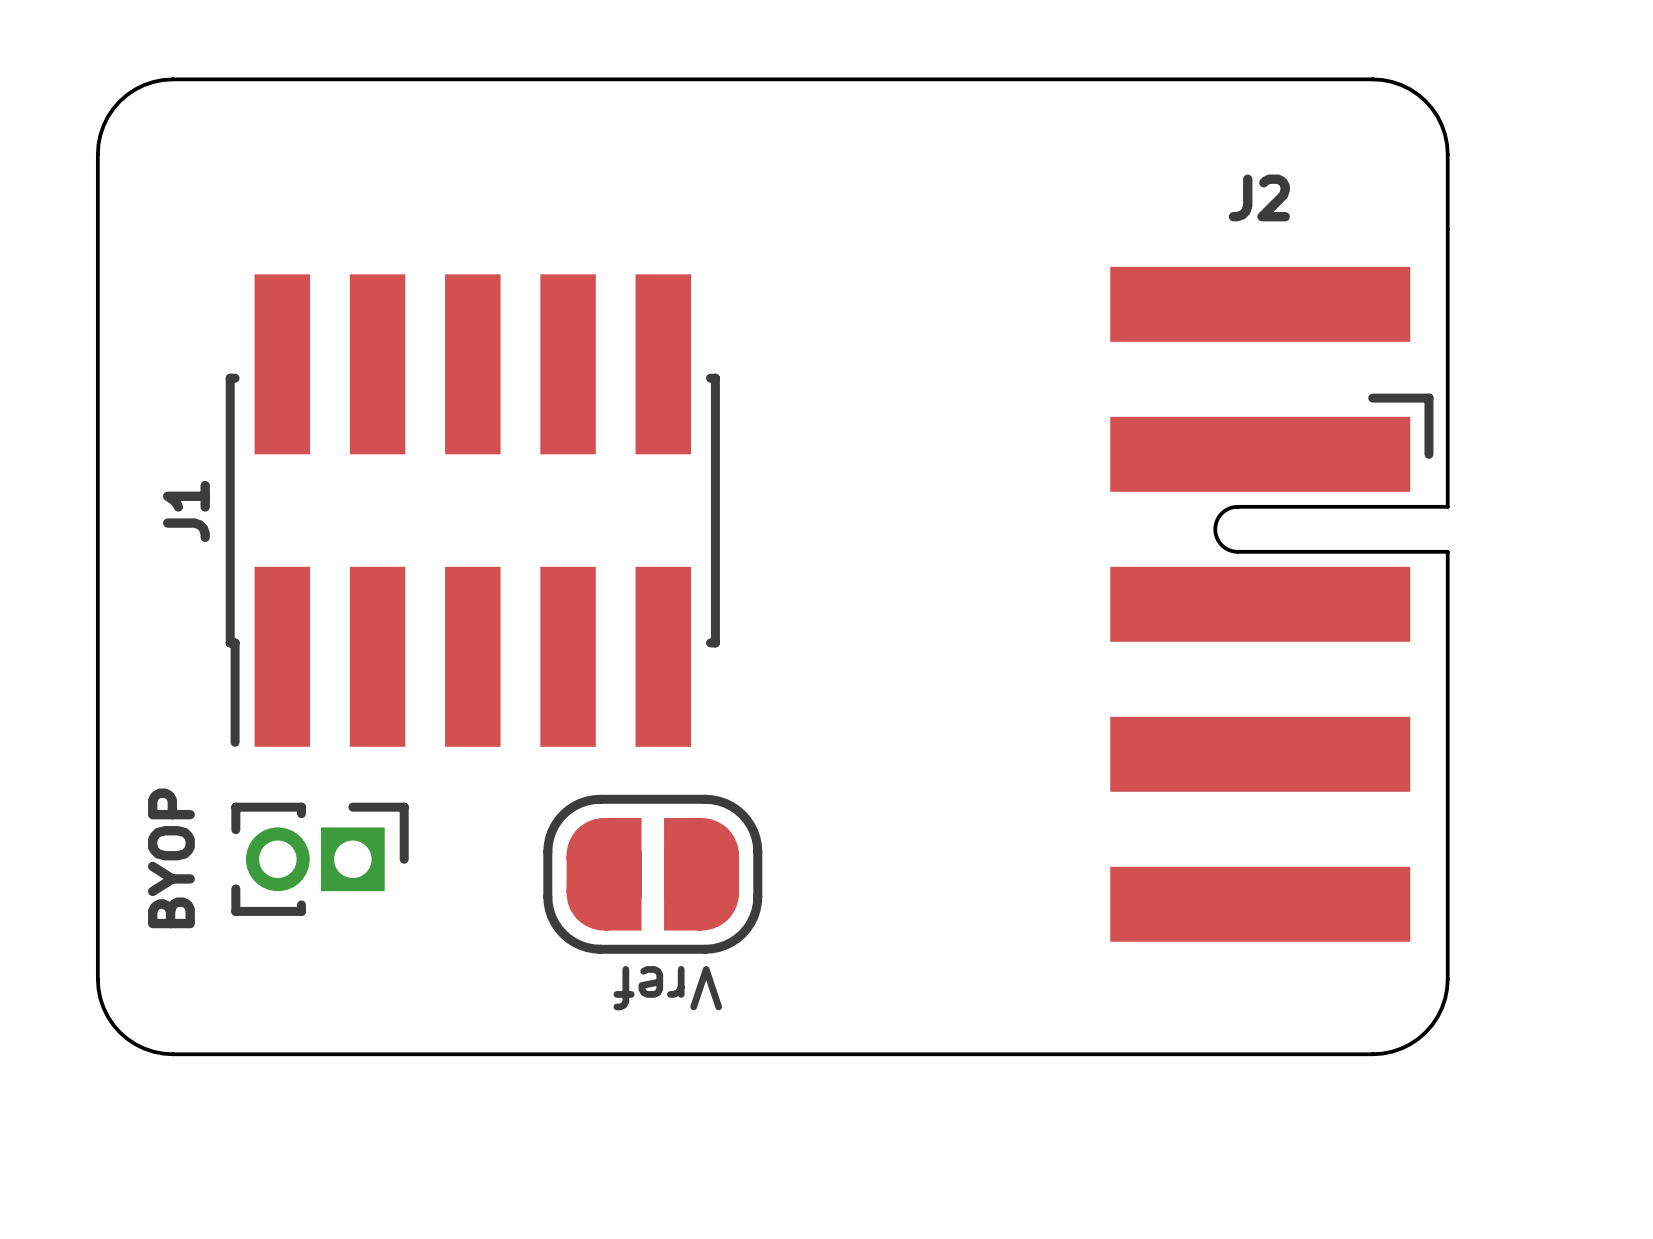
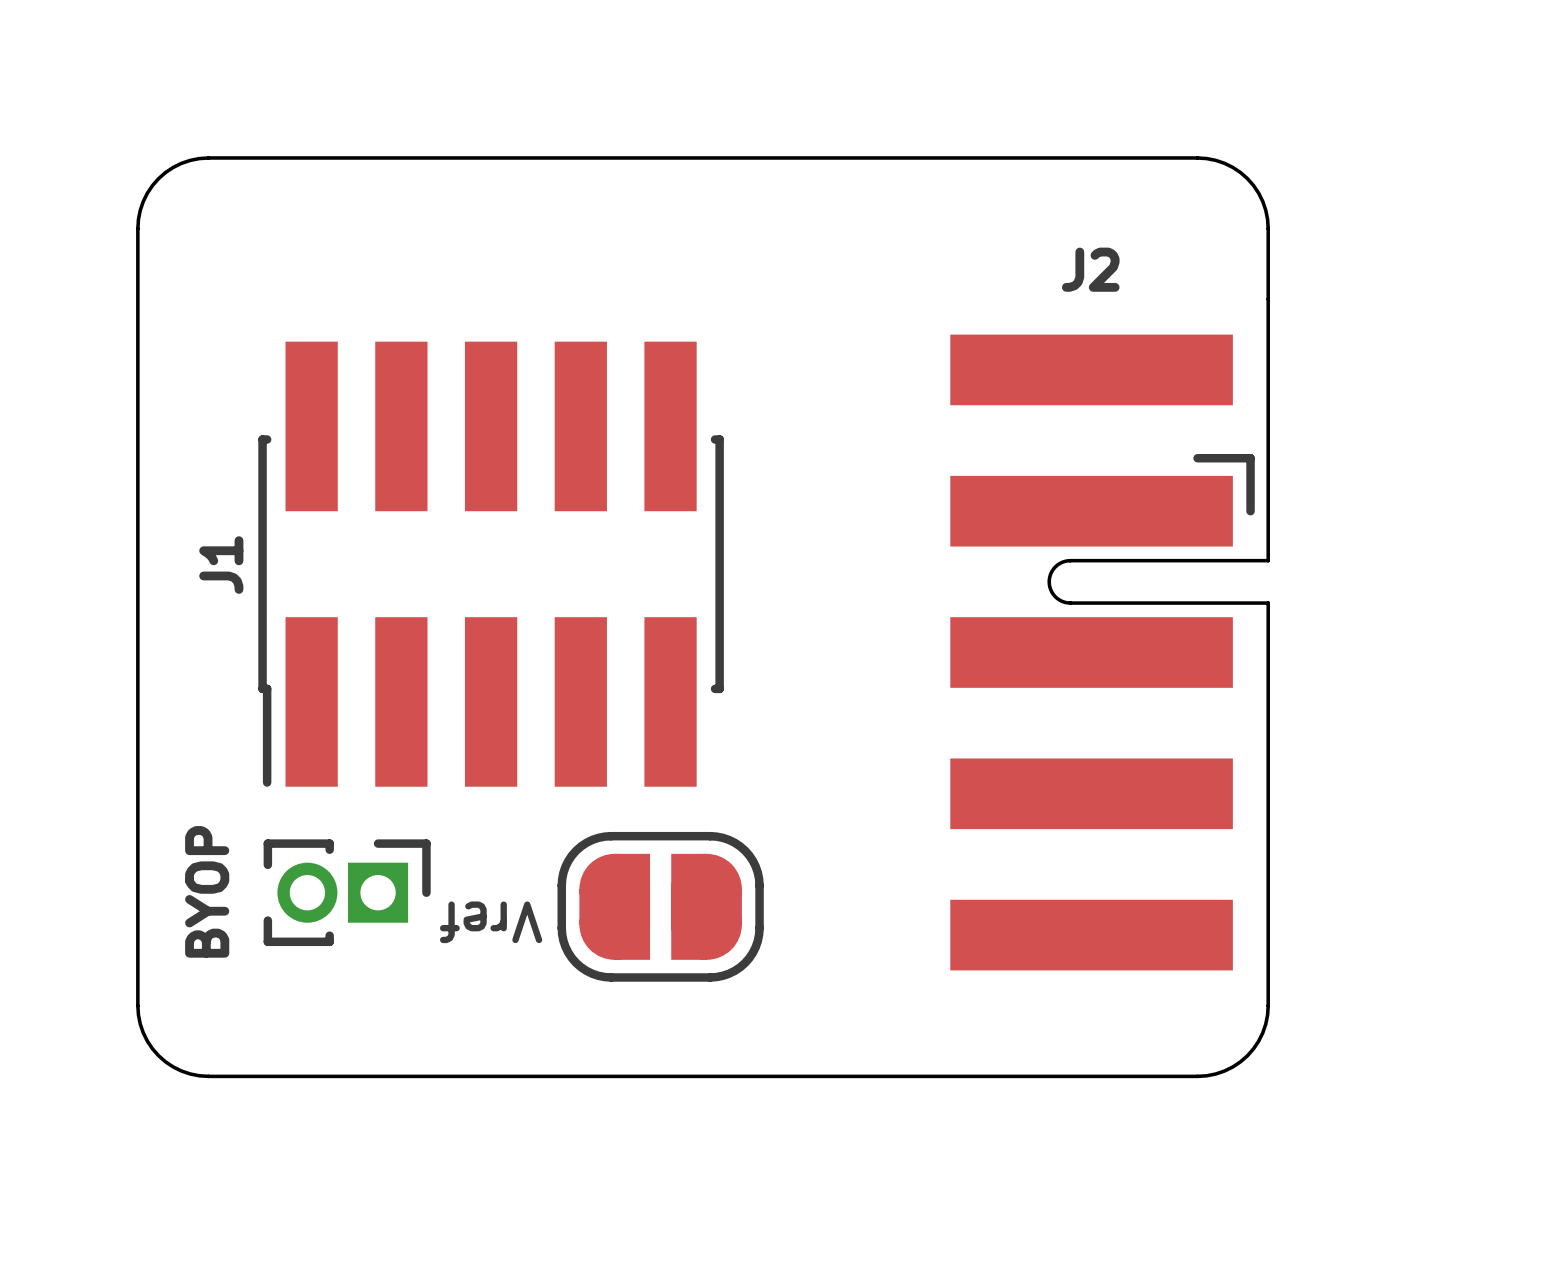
board edge: (1222, 79) (1372, 79) (1392, 81) (1410, 89) (1432, 108) (1445, 134) (1447, 154) (1447, 229) -> (1197, 157) (1215, 160) (1232, 167) (1247, 178) (1258, 193) (1267, 219) (1268, 299)
J2 position: (1279, 604) -> (1110, 652)
board edge: (1447, 979) (1442, 1007) (1432, 1024) (1418, 1038) (1392, 1051) (1372, 1054) (1222, 1054) -> (1268, 1005) (1262, 1032) (1247, 1055) (1224, 1071) (1197, 1076)
text position: Vref (667, 988) -> Vref (491, 922)

